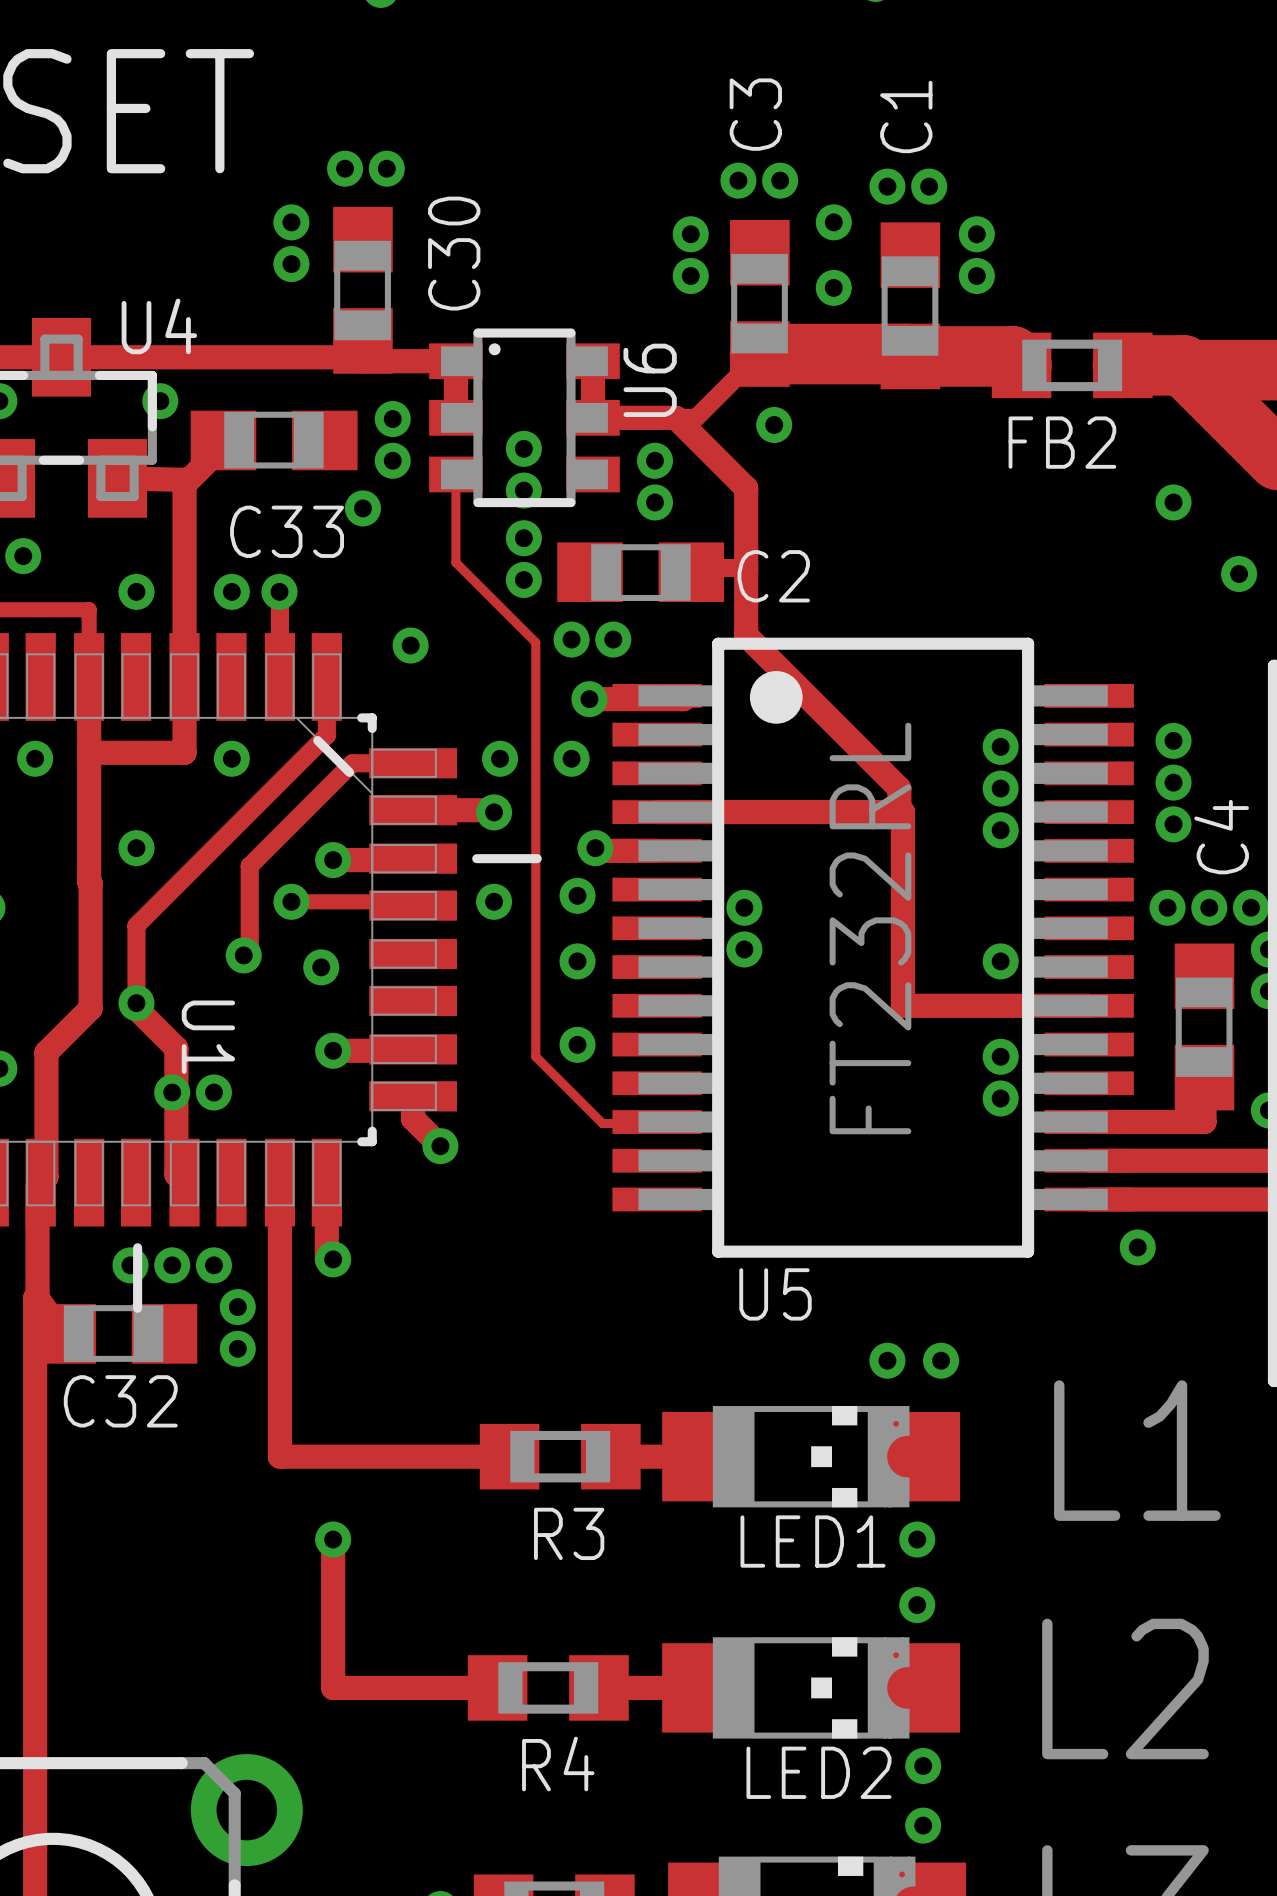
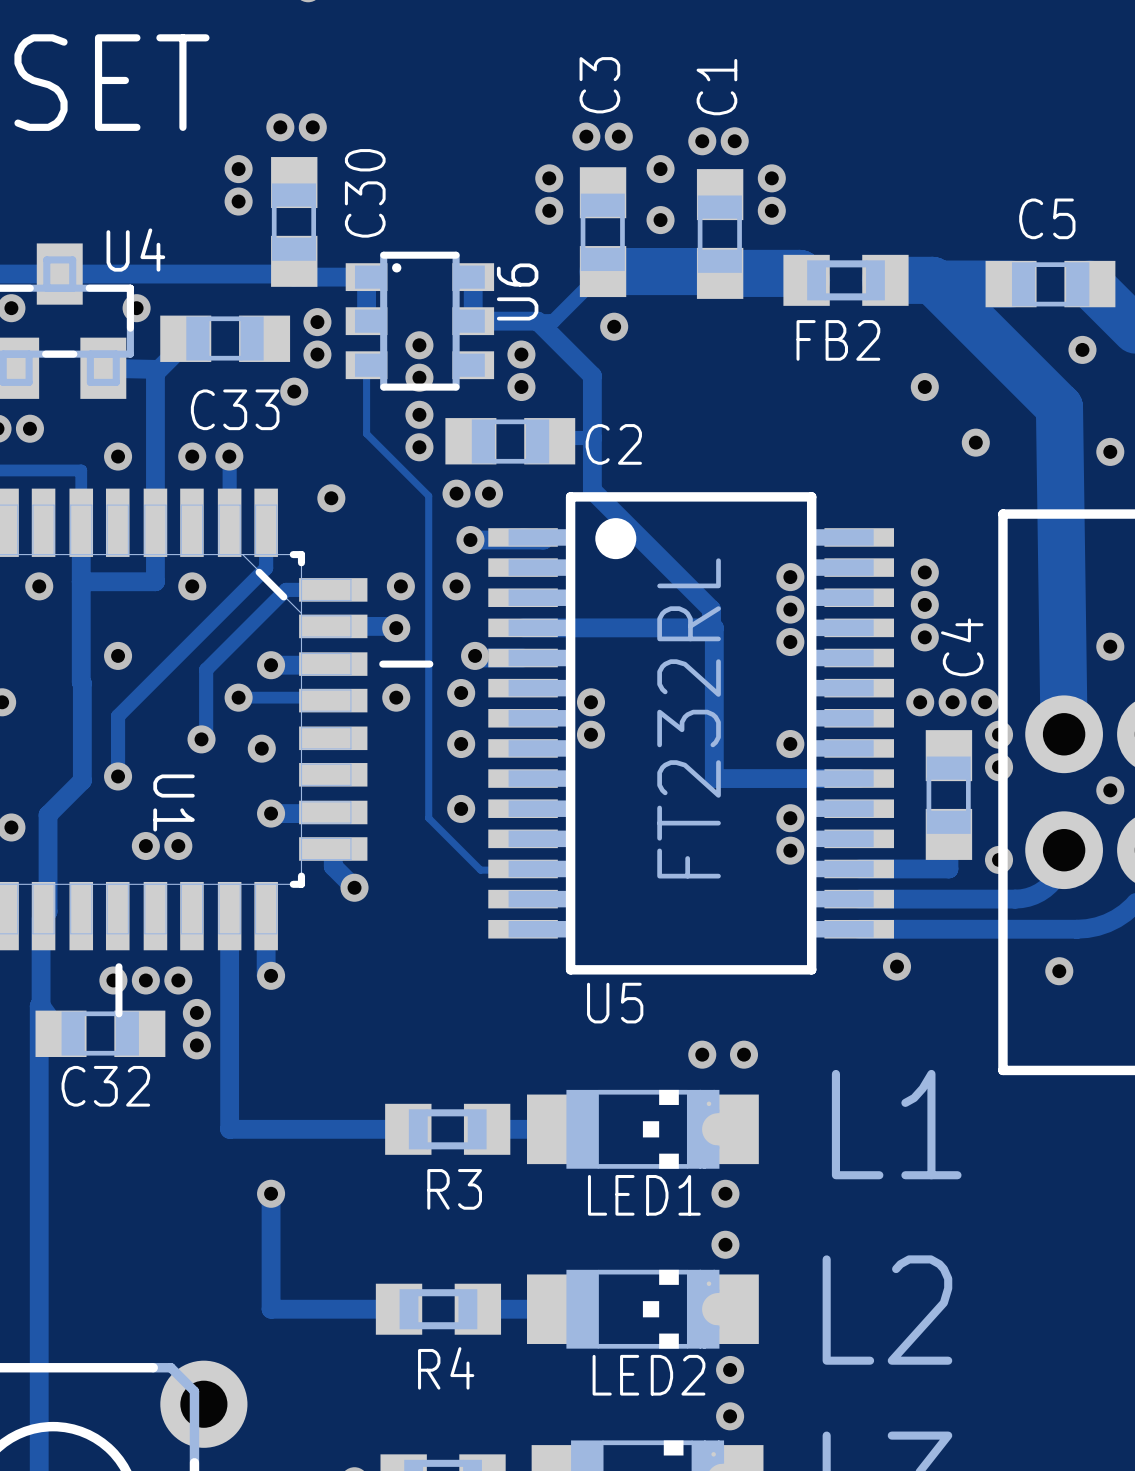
track: (136, 1008) (176, 1048) (176, 1174) (184, 1182) -> none

